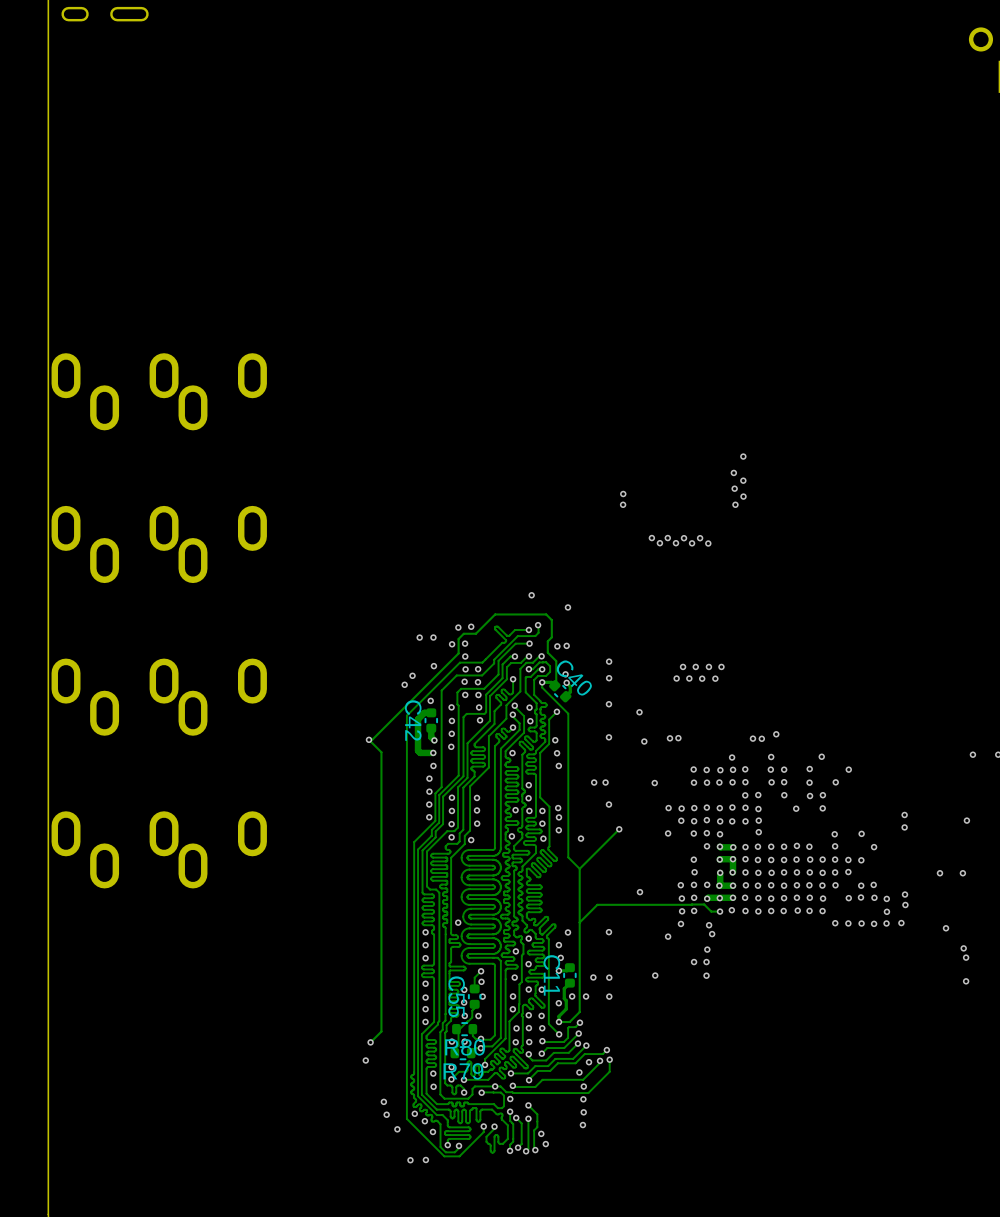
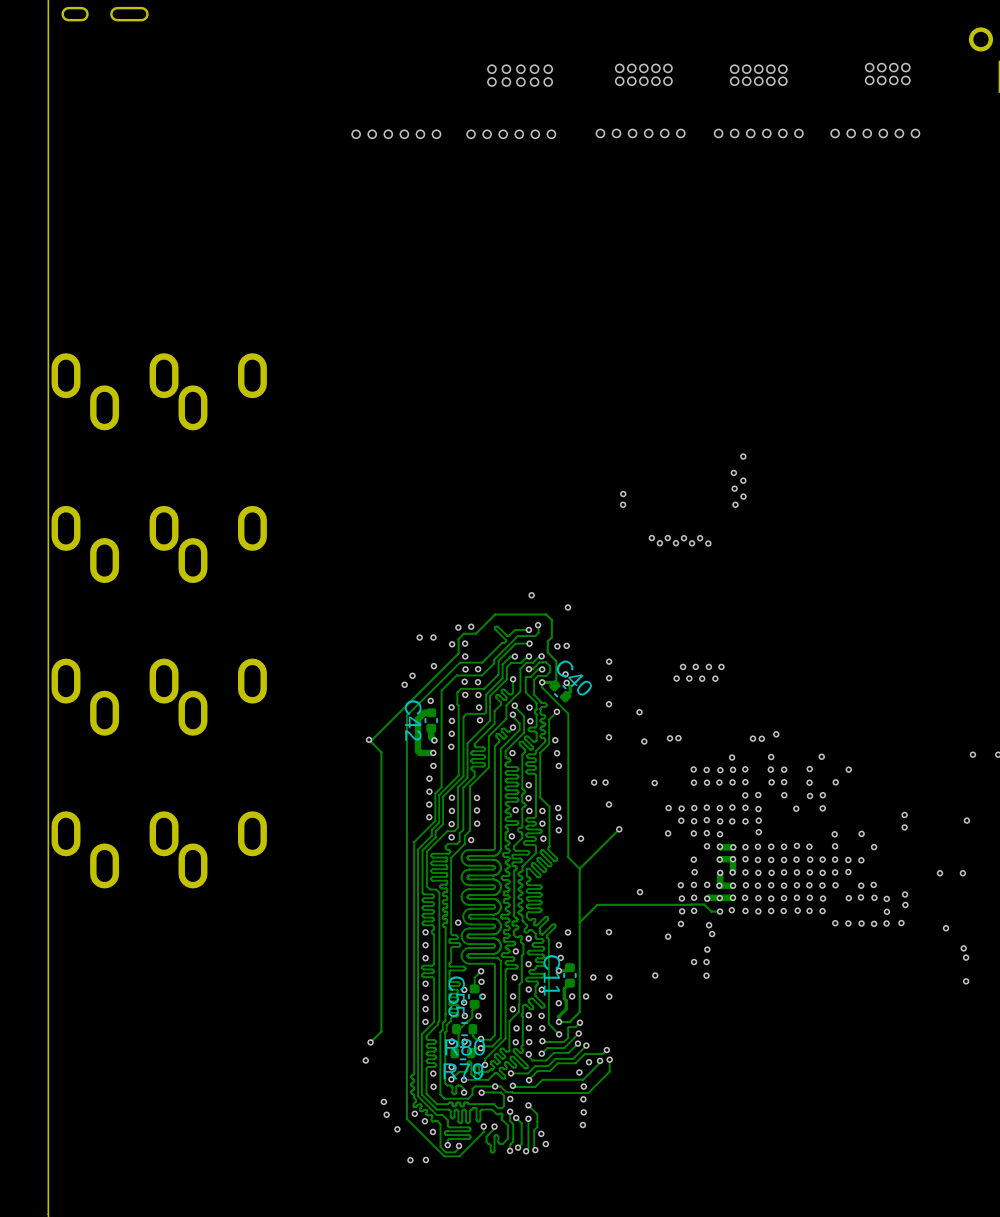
via: none -> (869, 67)
via: none -> (881, 67)
via: none -> (893, 67)
via: none -> (905, 67)
via: none -> (619, 68)
via: none -> (631, 68)
via: none -> (643, 68)
via: none -> (655, 68)
via: none -> (667, 68)
via: none -> (491, 69)
via: none -> (506, 69)
via: none -> (520, 69)
via: none -> (534, 69)
via: none -> (548, 69)
via: none -> (734, 69)
via: none -> (746, 69)
via: none -> (758, 69)
via: none -> (770, 69)
via: none -> (782, 69)
via: none -> (869, 80)
via: none -> (881, 80)
via: none -> (893, 80)
via: none -> (905, 80)
via: none -> (619, 81)
via: none -> (631, 81)
via: none -> (643, 81)
via: none -> (655, 81)
via: none -> (667, 81)
via: none -> (734, 81)
via: none -> (746, 81)
via: none -> (758, 81)
via: none -> (770, 81)
via: none -> (782, 81)
via: none -> (491, 82)
via: none -> (506, 82)
via: none -> (520, 82)
via: none -> (534, 82)
via: none -> (548, 82)
via: none -> (600, 133)
via: none -> (616, 133)
via: none -> (632, 133)
via: none -> (648, 133)
via: none -> (664, 133)
via: none -> (680, 133)
via: none -> (718, 133)
via: none -> (734, 133)
via: none -> (750, 133)
via: none -> (766, 133)
via: none -> (782, 133)
via: none -> (798, 133)
via: none -> (835, 133)
via: none -> (851, 133)
via: none -> (867, 133)
via: none -> (883, 133)
via: none -> (899, 133)
via: none -> (915, 133)
via: none -> (356, 134)
via: none -> (372, 134)
via: none -> (388, 134)
via: none -> (404, 134)
via: none -> (420, 134)
via: none -> (436, 134)
via: none -> (471, 134)
via: none -> (487, 134)
via: none -> (503, 134)
via: none -> (519, 134)
via: none -> (535, 134)
via: none -> (551, 134)

